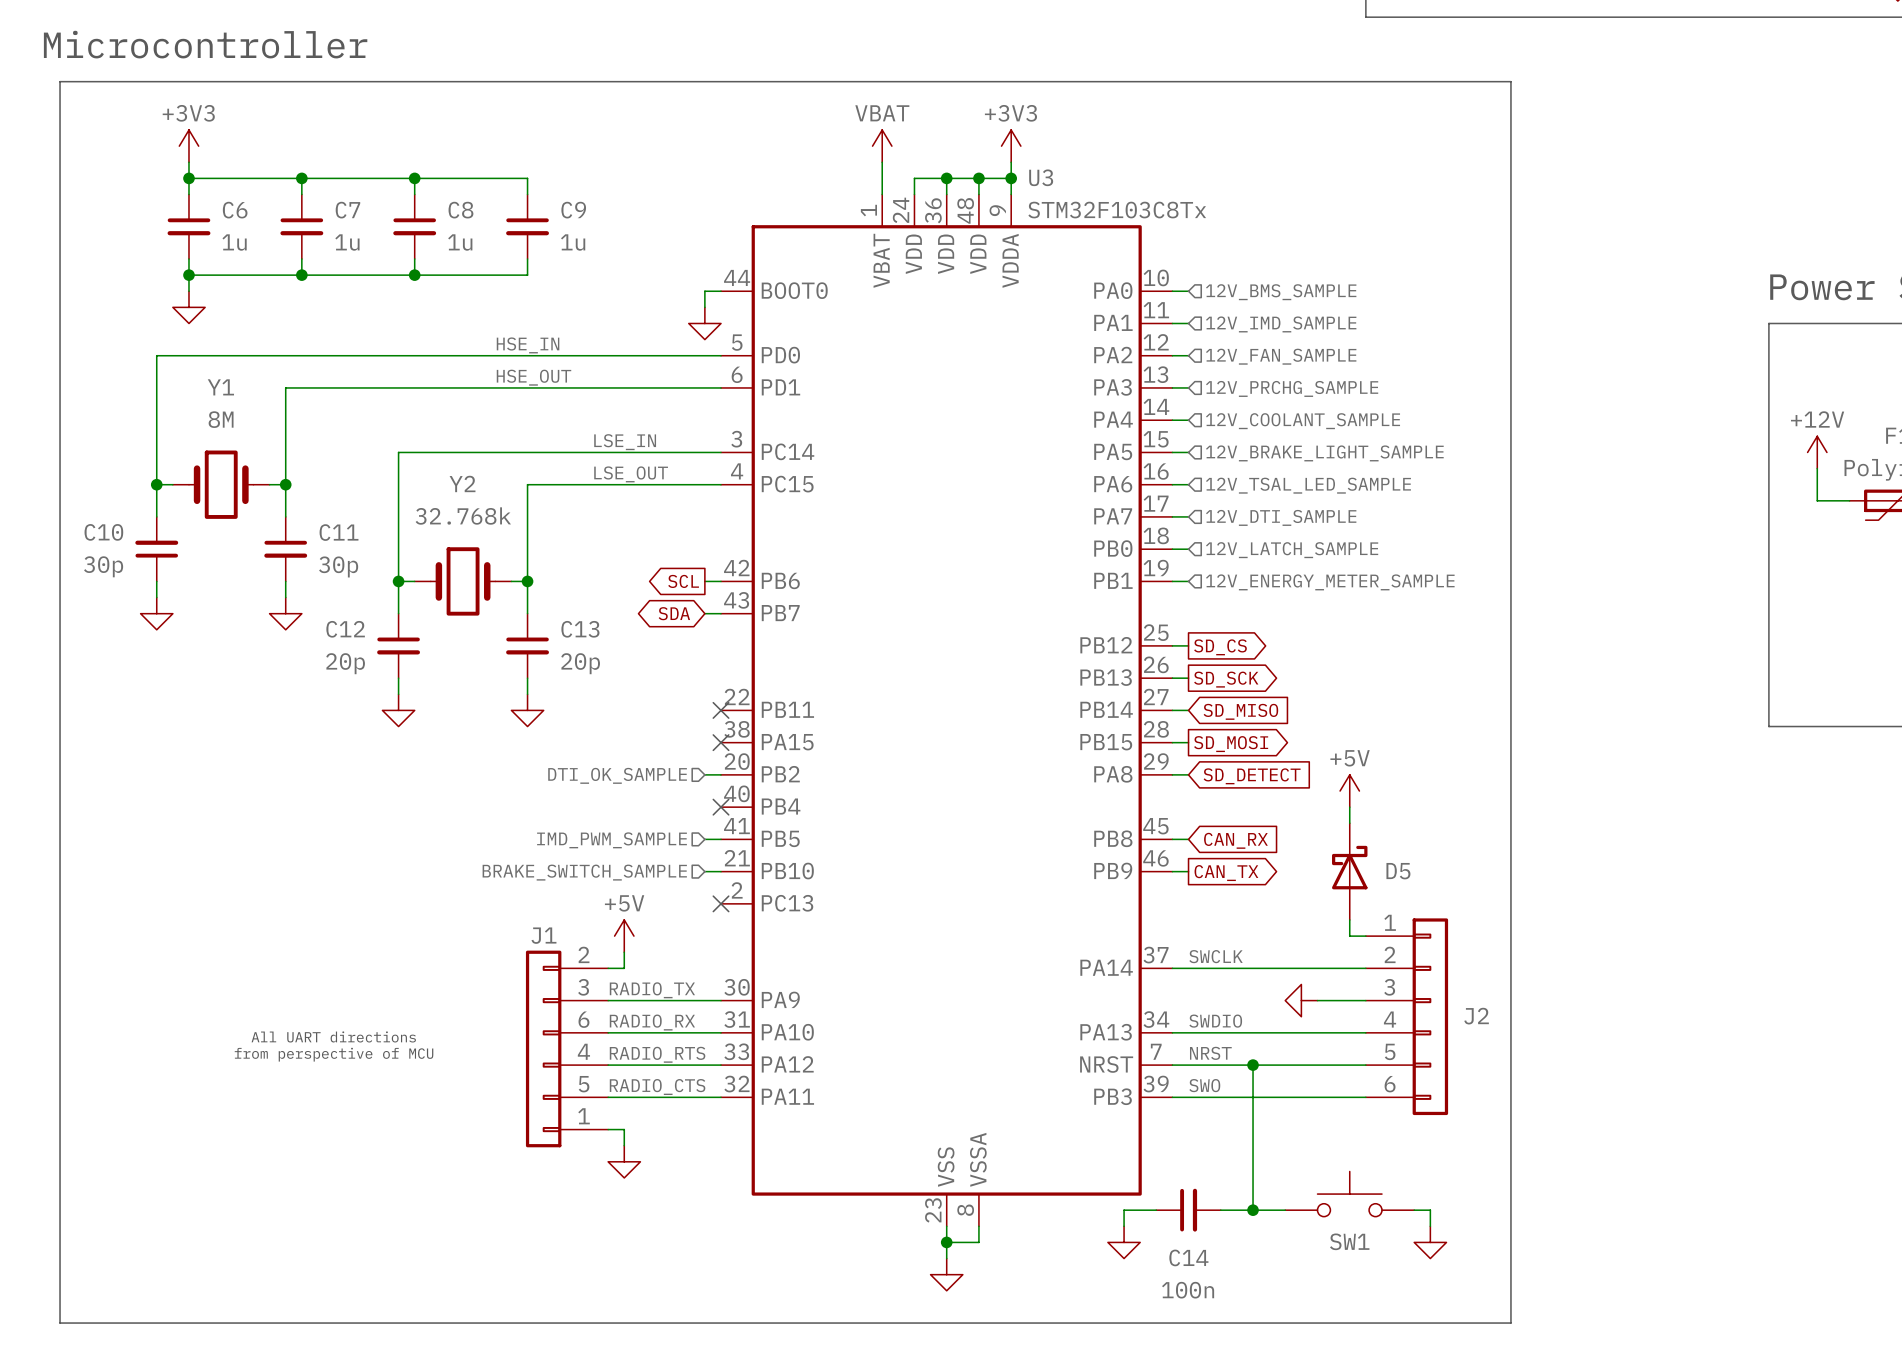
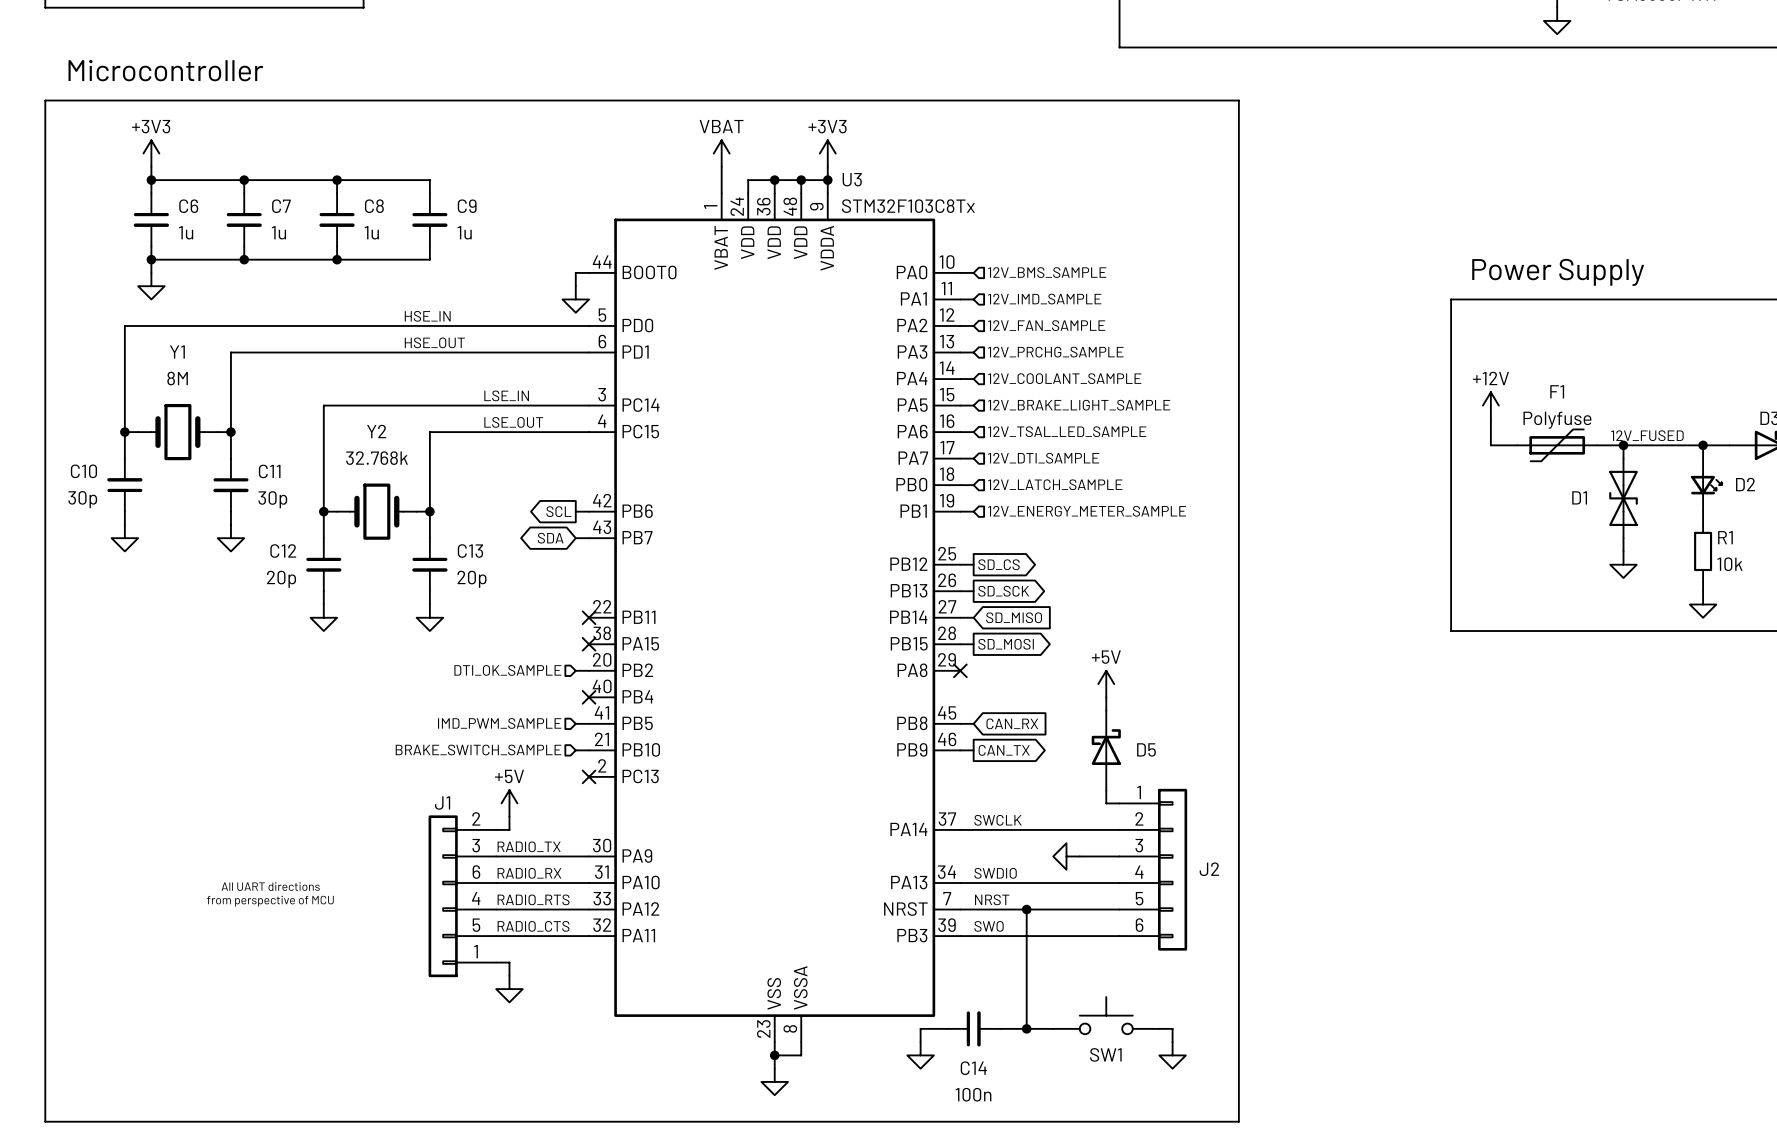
wire: (1172, 774) (1188, 774) -> none
no-connect mark: none -> (960, 670)
global label: SD_DETECT (1252, 776) -> none

